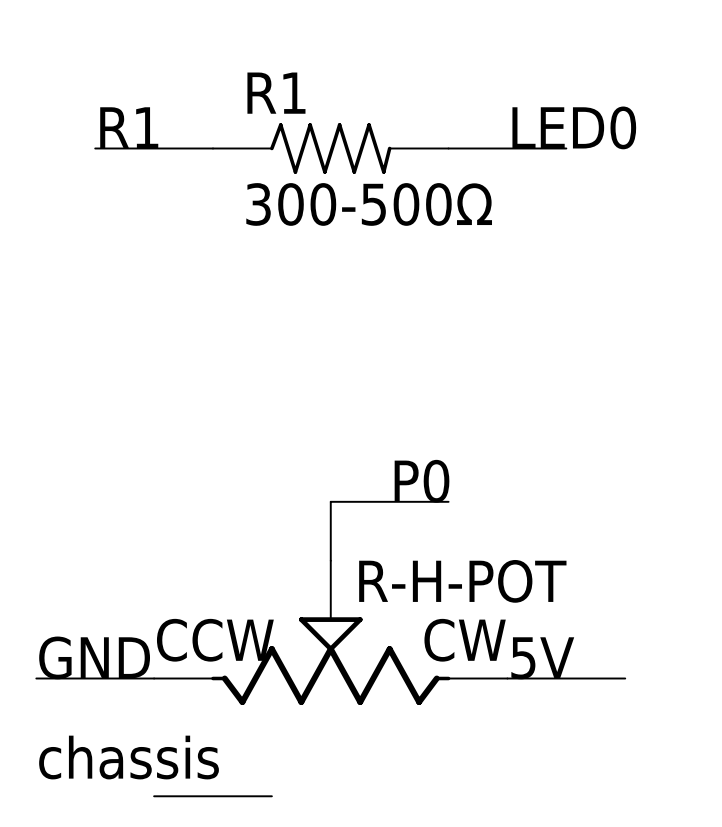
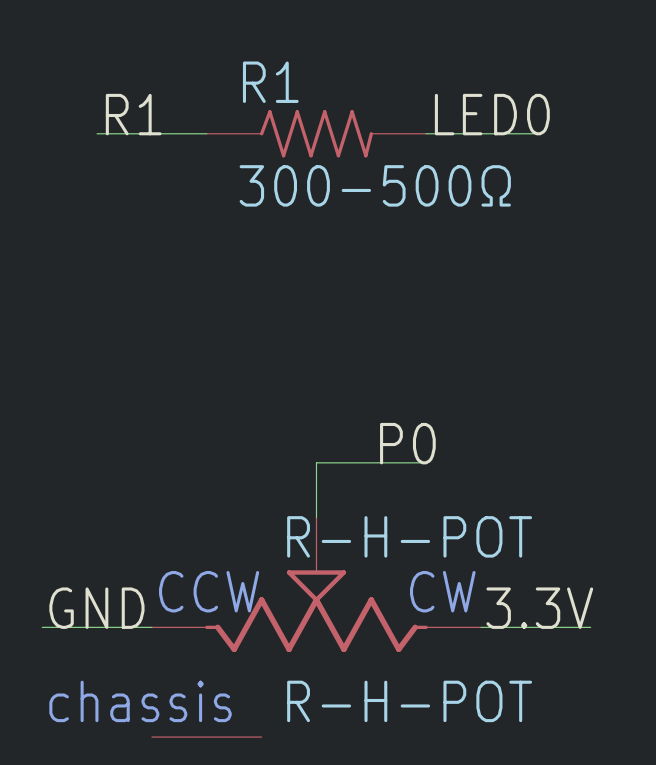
label position: LED0 (574, 127) -> LED0 (492, 114)
label: 5V (542, 658) -> 3.3V (539, 608)
R-H-POT value: none -> R-H-POT (409, 701)

